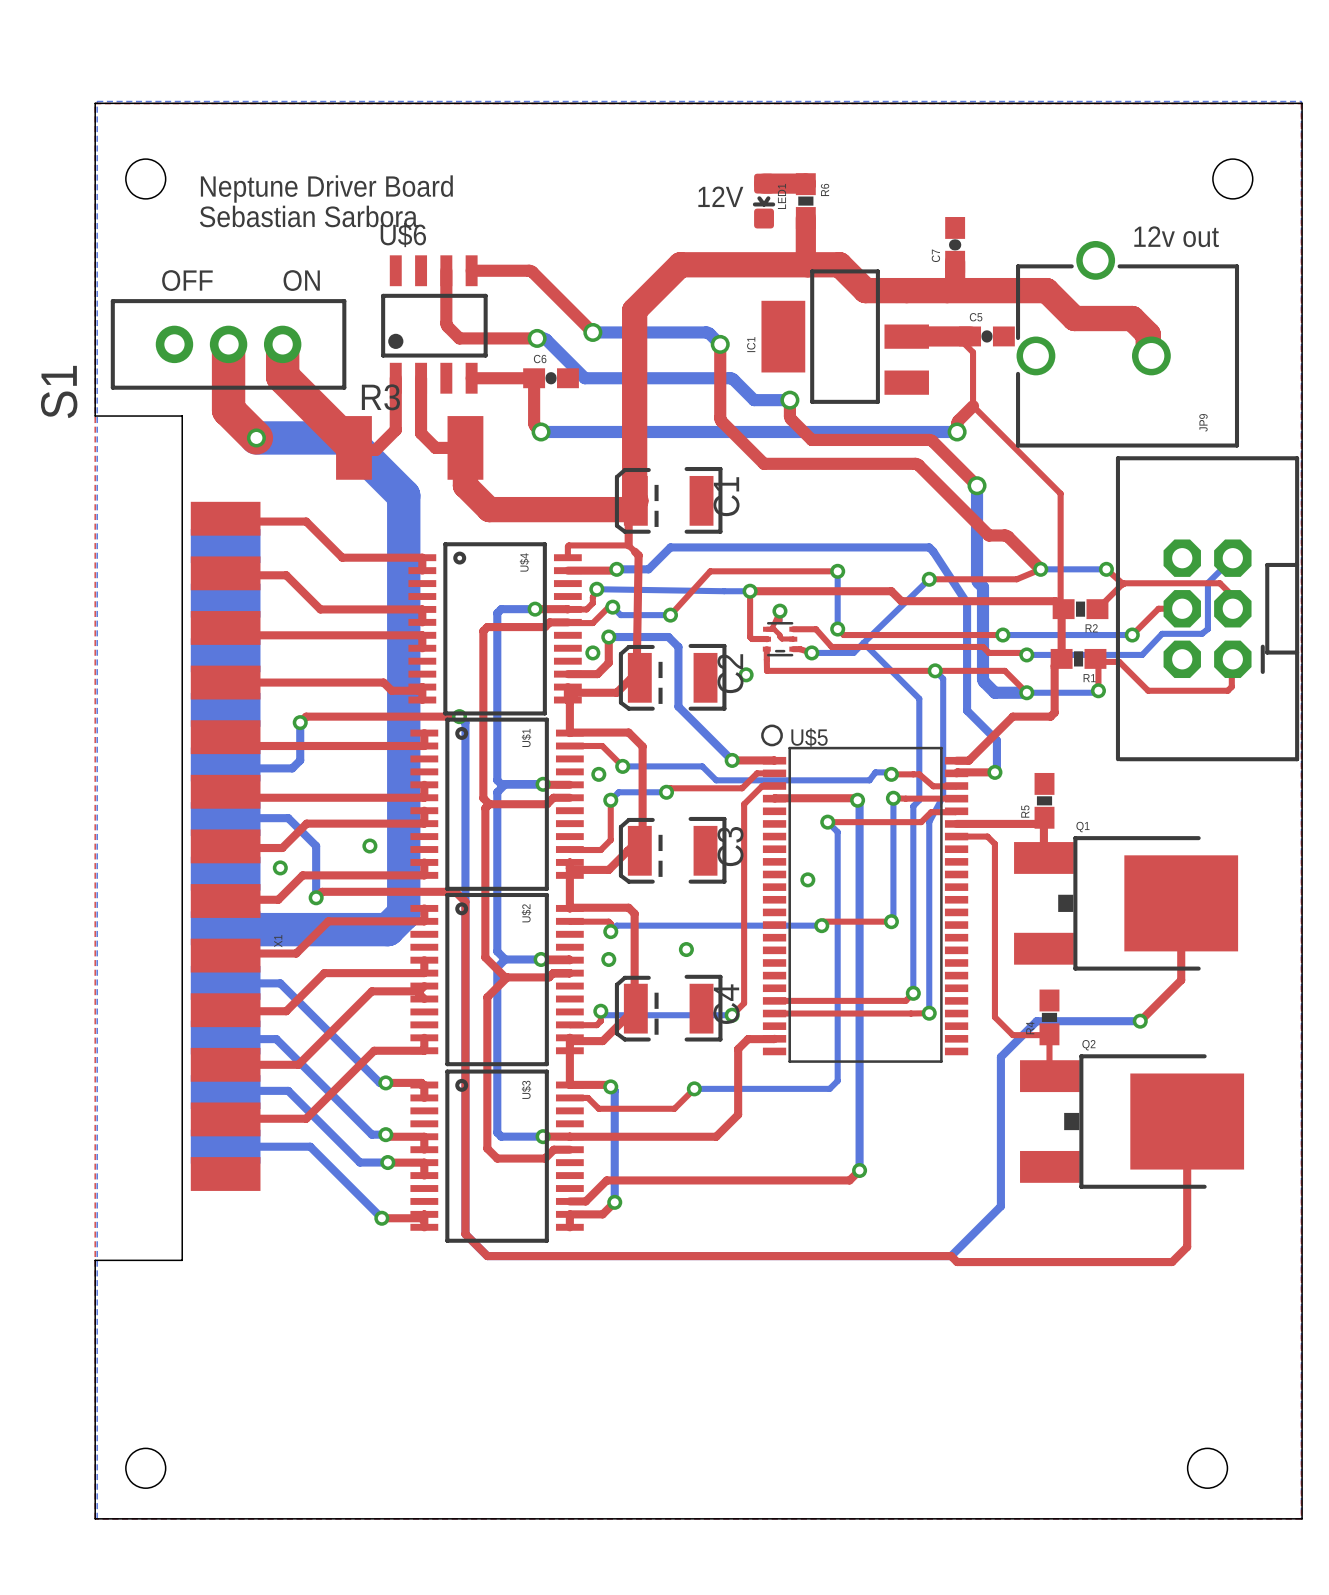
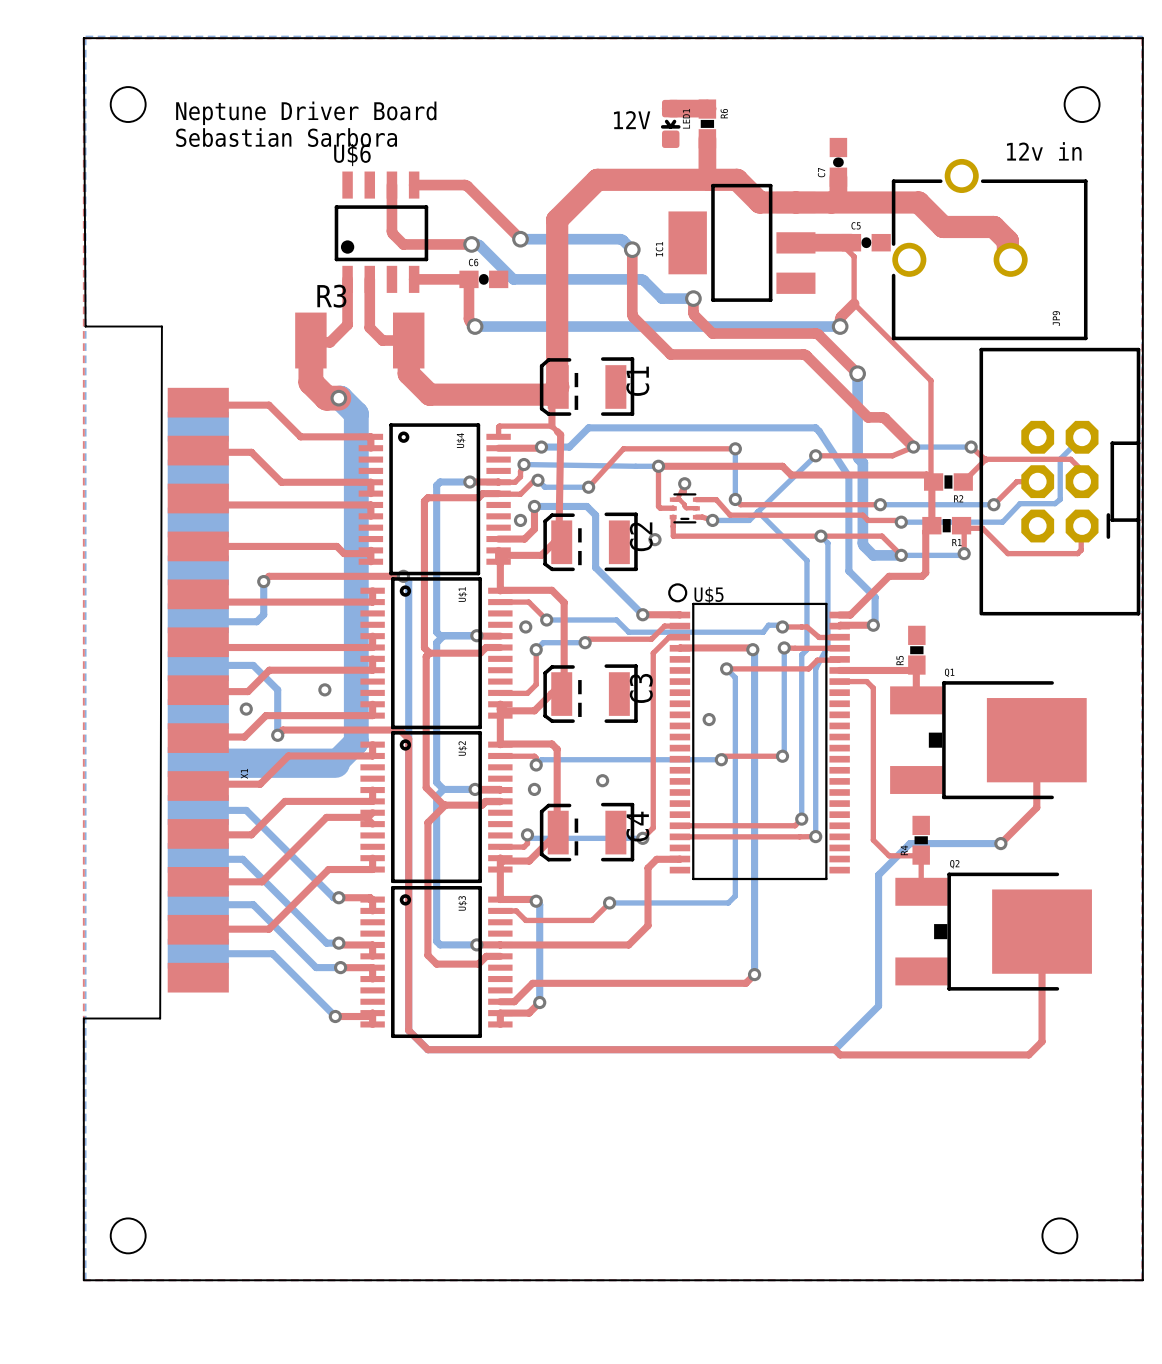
board edge: (95, 103) (95, 416) (182, 416) (182, 1260) (95, 1260) -> (83, 38) (85, 326) (161, 326) (160, 1018) (83, 1018) (83, 1053)
text: 12v out (1176, 236) -> 12v in (1044, 151)
text: OFF (187, 280) -> none
text: ON (301, 280) -> none
top track: (228, 344) (228, 410) (256, 437) -> none
S1: (228, 344) -> none
top track: (282, 344) (282, 376) (353, 447) -> (338, 398) (326, 398) (310, 382) (310, 340)
bottom track: (256, 437) (346, 437) (403, 495) (403, 913) (387, 929) (381, 929) -> (338, 398) (356, 413) (356, 742) (335, 763)
via: (256, 437) -> none
via: none -> (338, 398)

